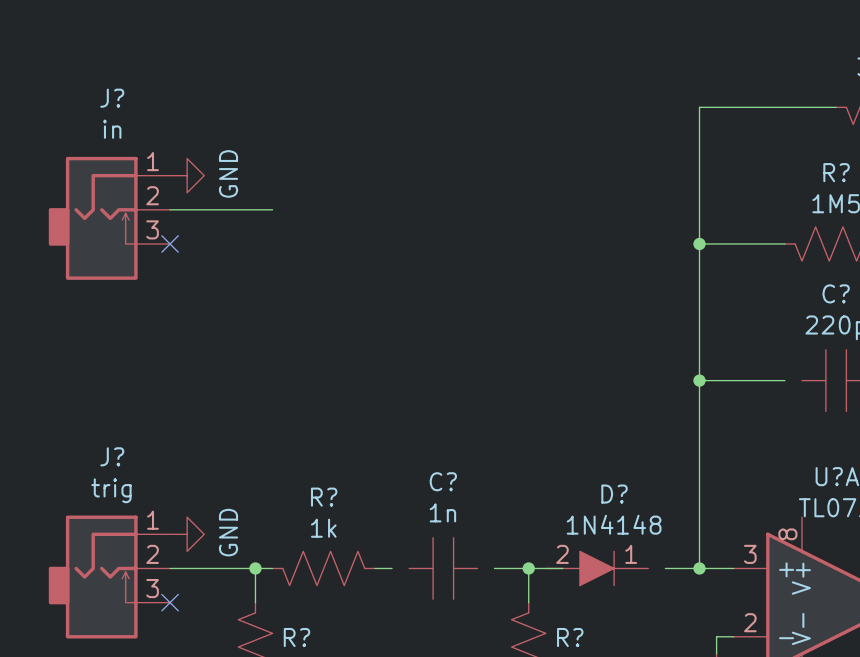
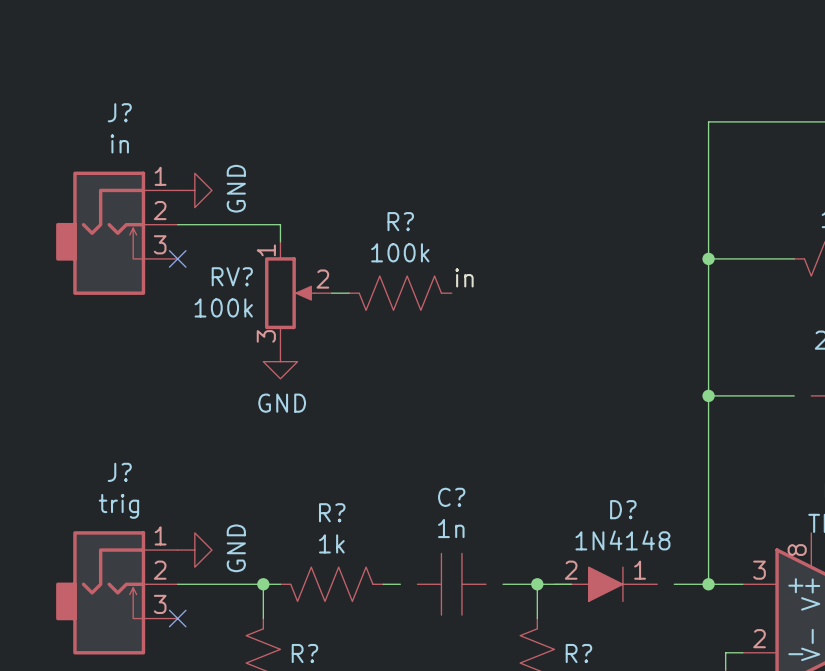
wire: none -> (280, 224) (280, 241)
label: none -> in (464, 277)
RV?: none -> 100k (298, 293)
wire: none -> (331, 293) (348, 293)
R?: none -> 100k (400, 293)
power symbol: none -> GND (280, 361)

